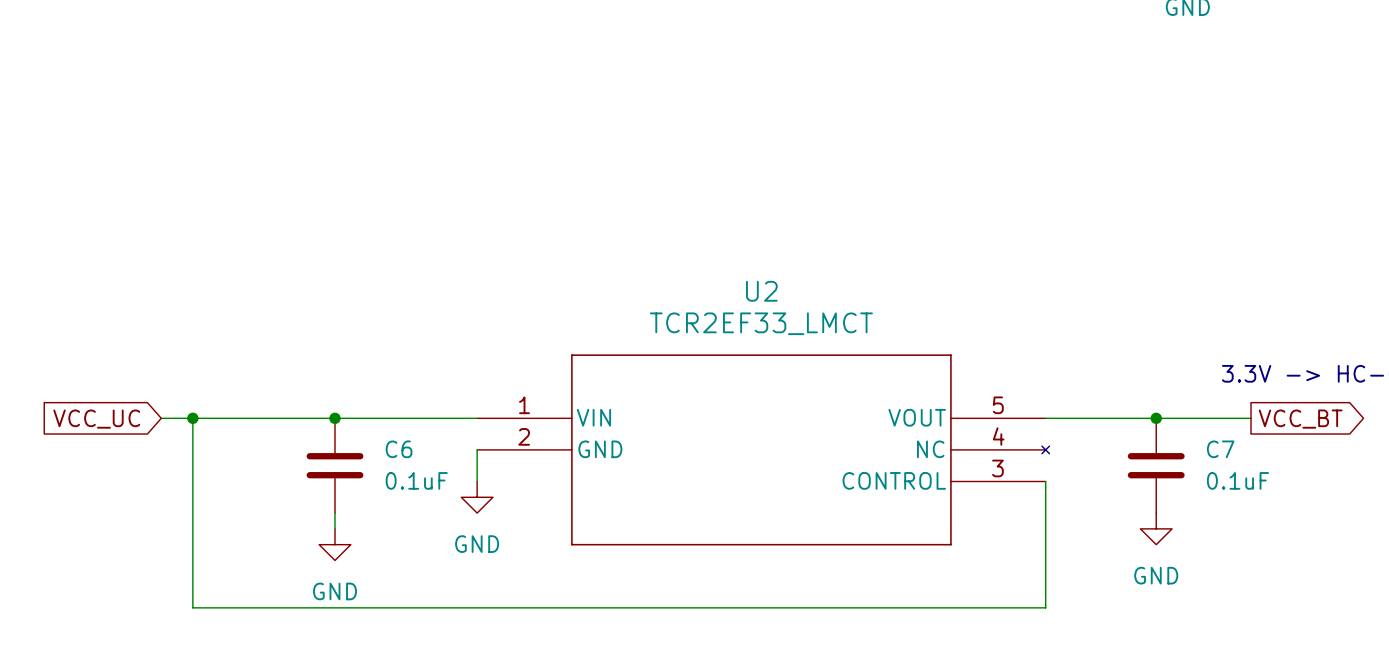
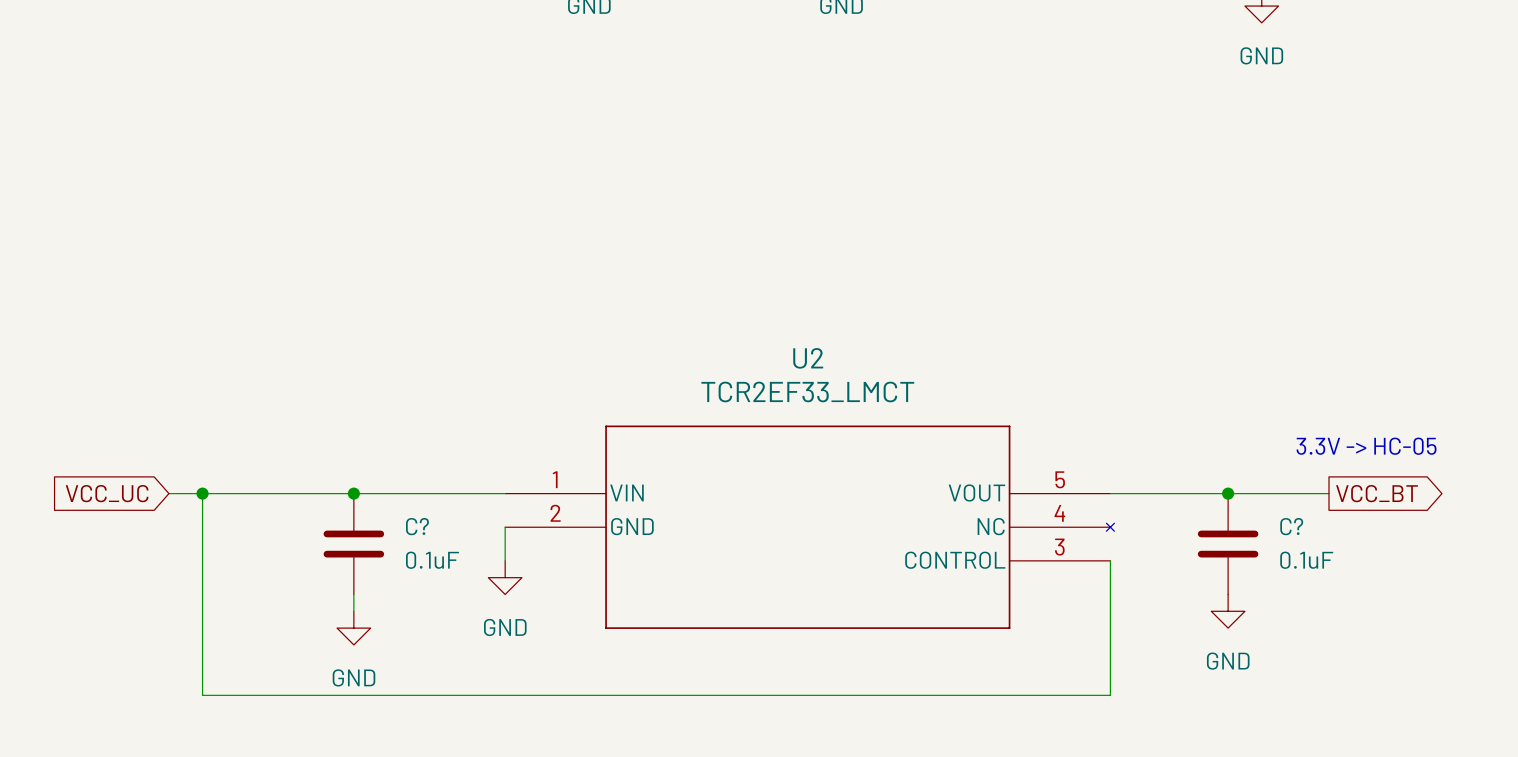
C6 name: C6 (399, 449) -> C? (417, 526)
C7 name: C7 (1220, 449) -> C? (1291, 526)

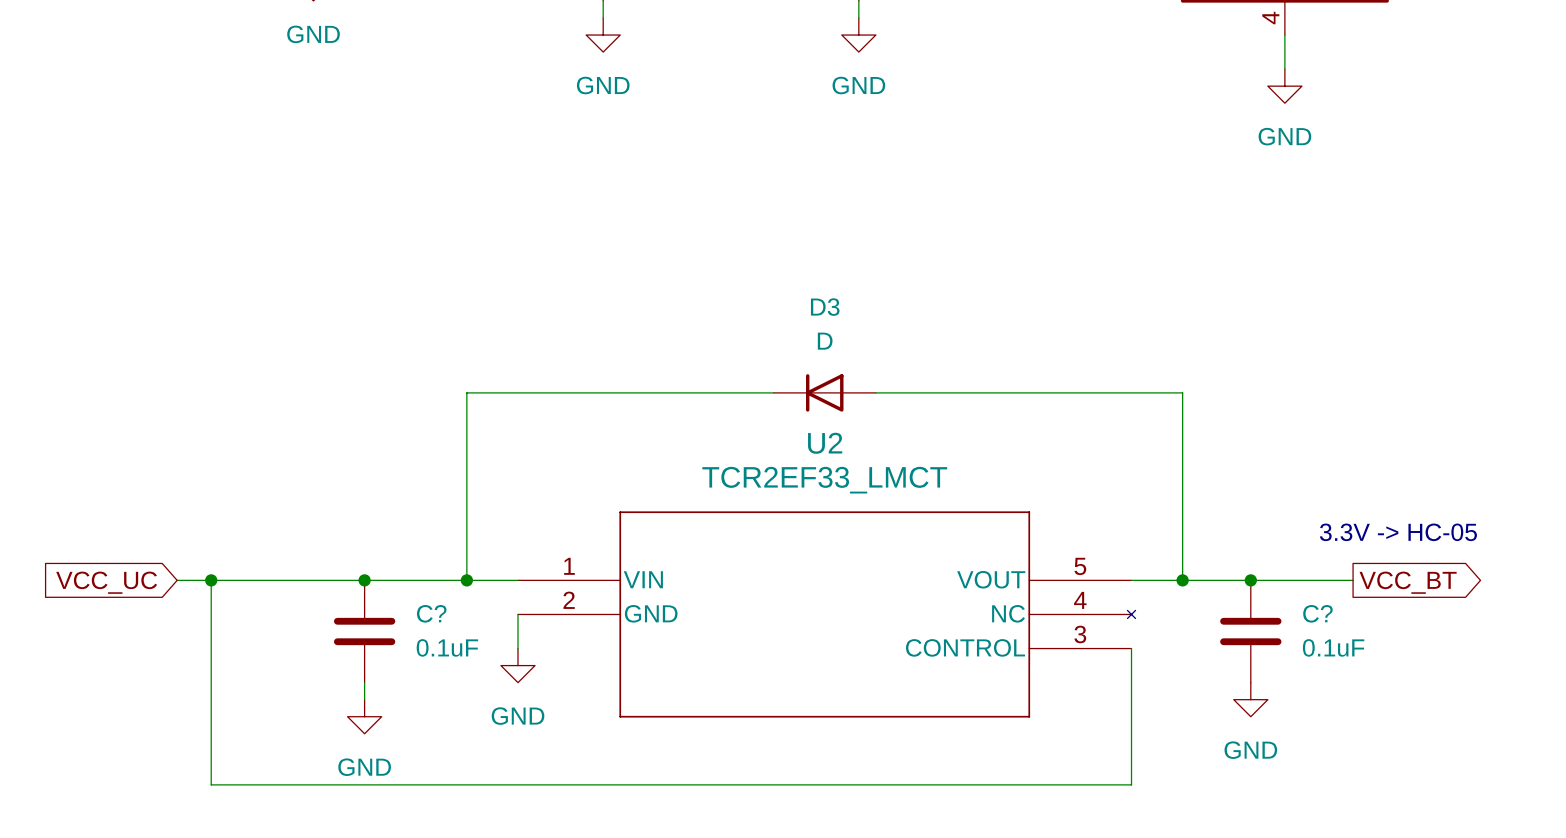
wire: none -> (773, 392) (466, 392) (466, 580)
D3: none -> D (824, 392)
wire: none -> (875, 392) (1182, 392) (1182, 580)
junction: none -> (466, 580)
junction: none -> (1182, 580)

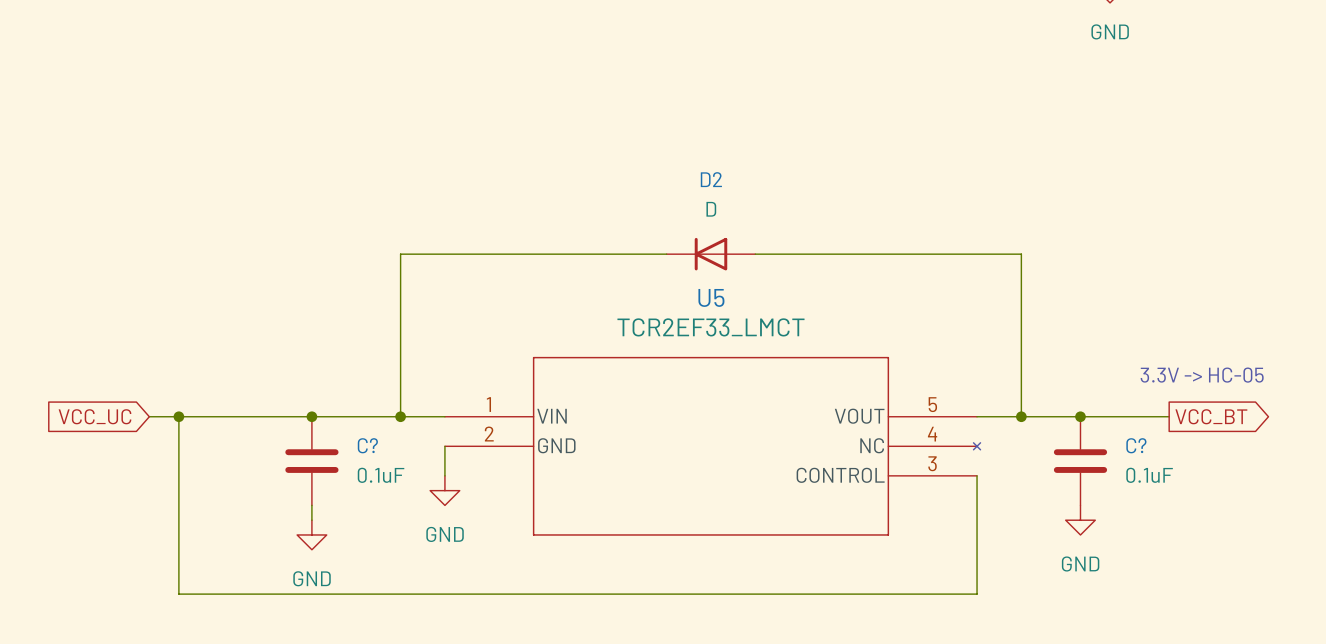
D3 name: D3 (825, 307) -> D2 (711, 179)
U2 name: U2 (825, 443) -> U5 (711, 297)

